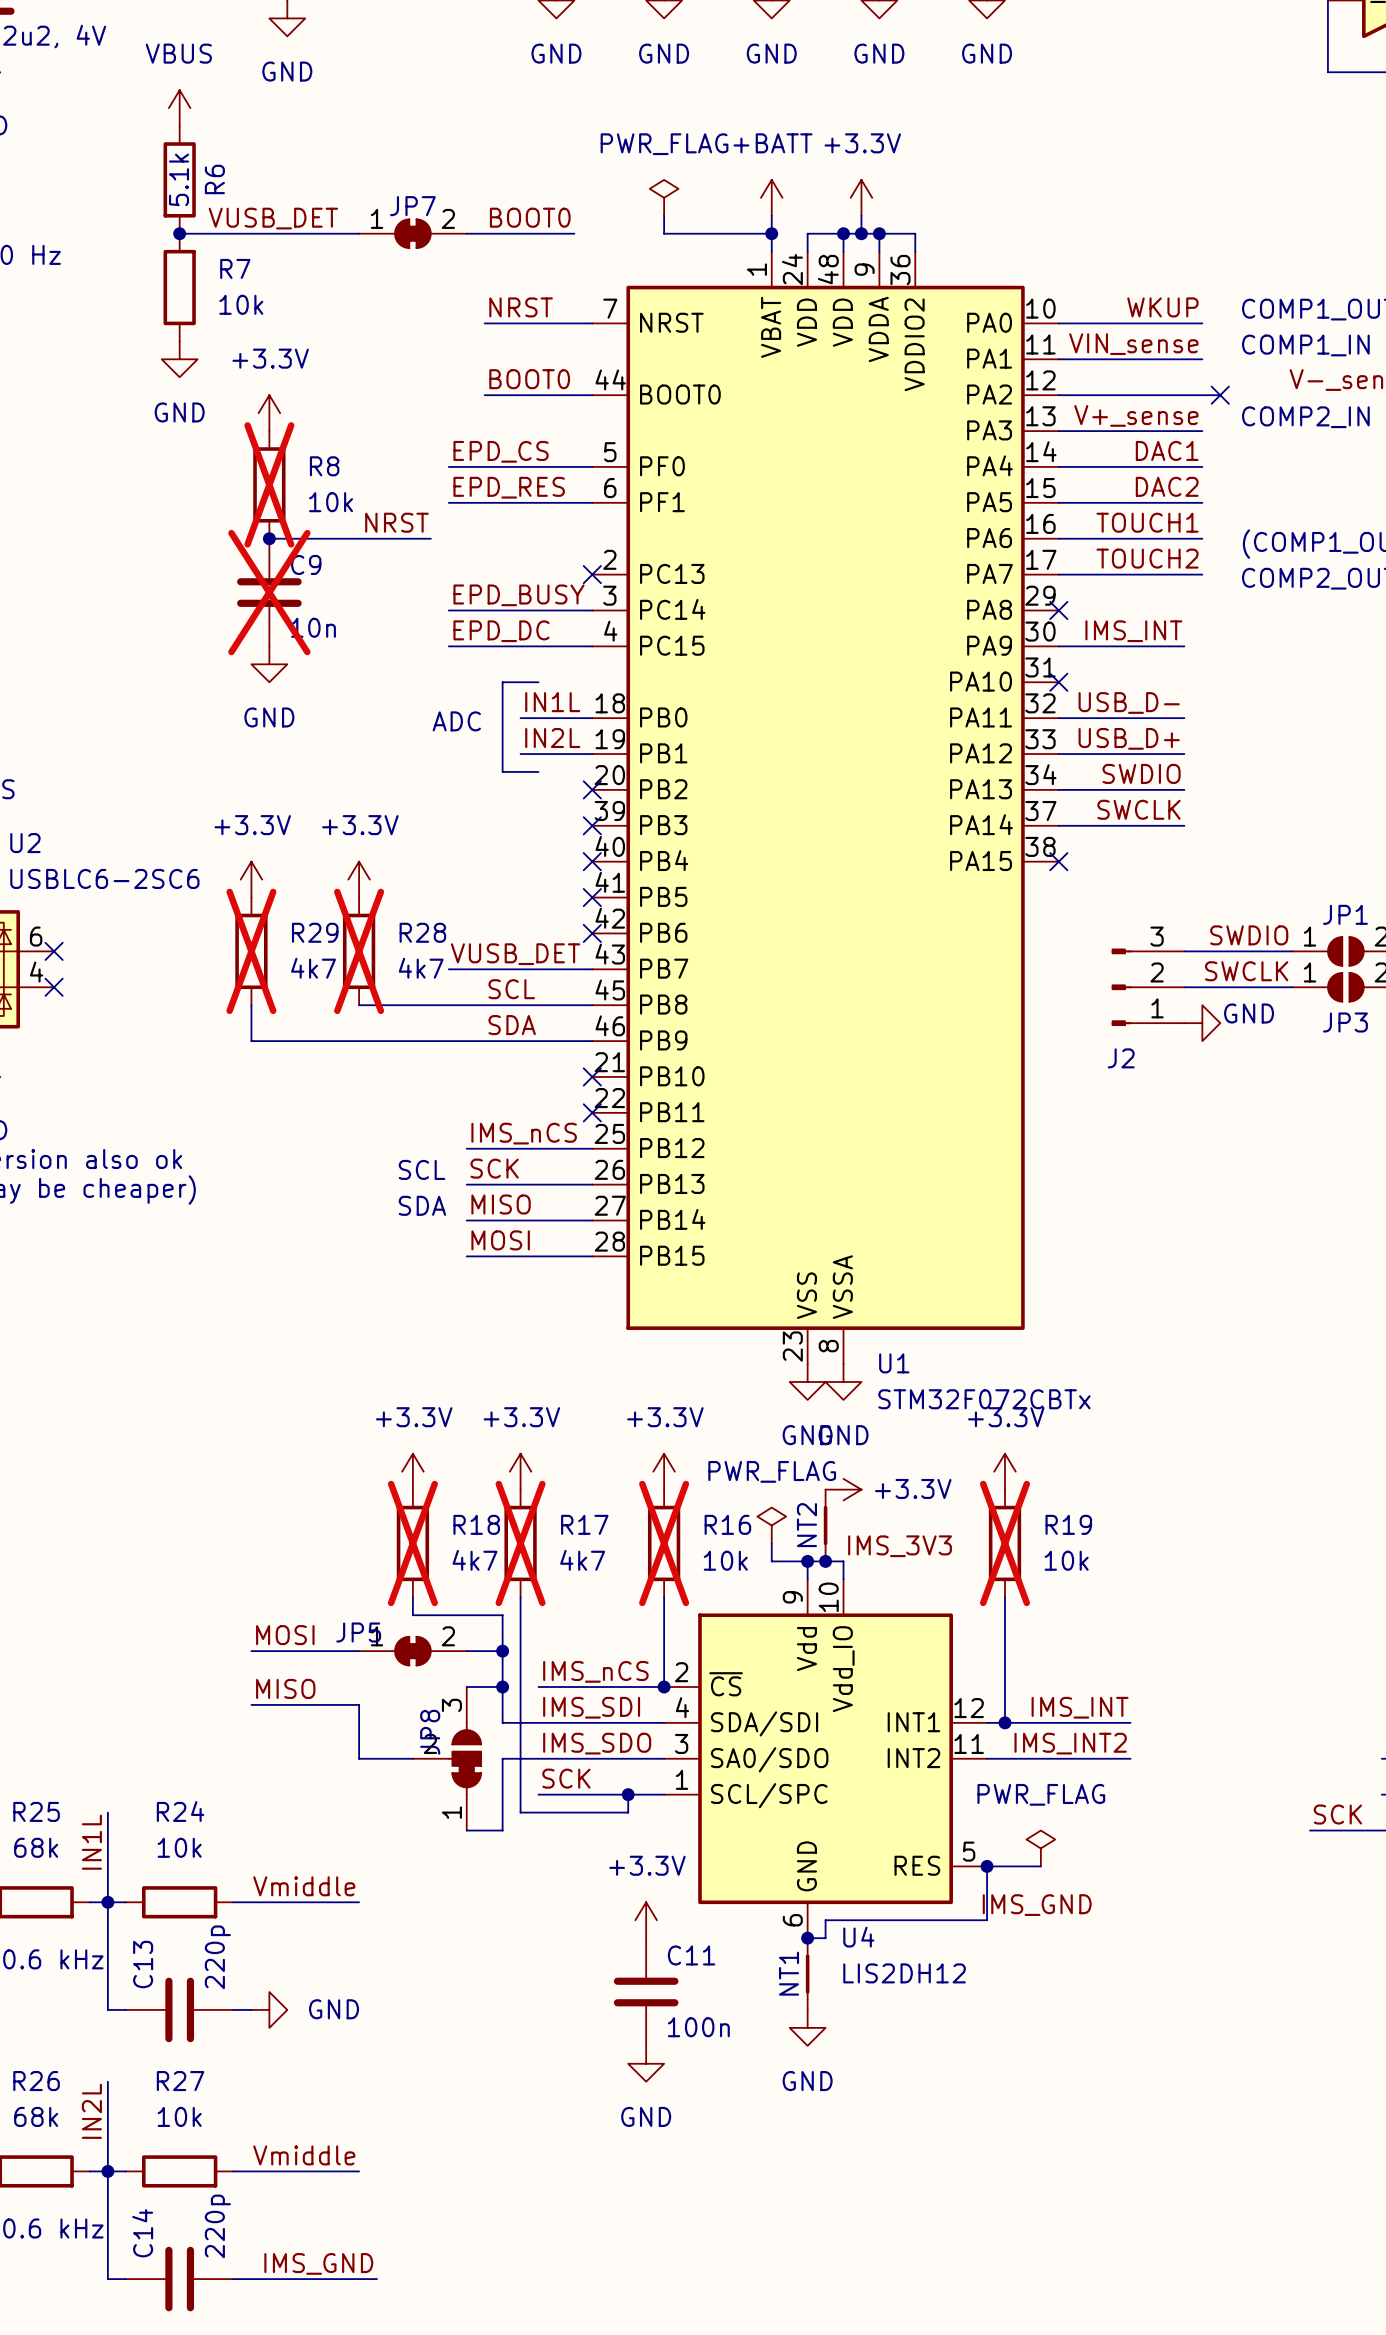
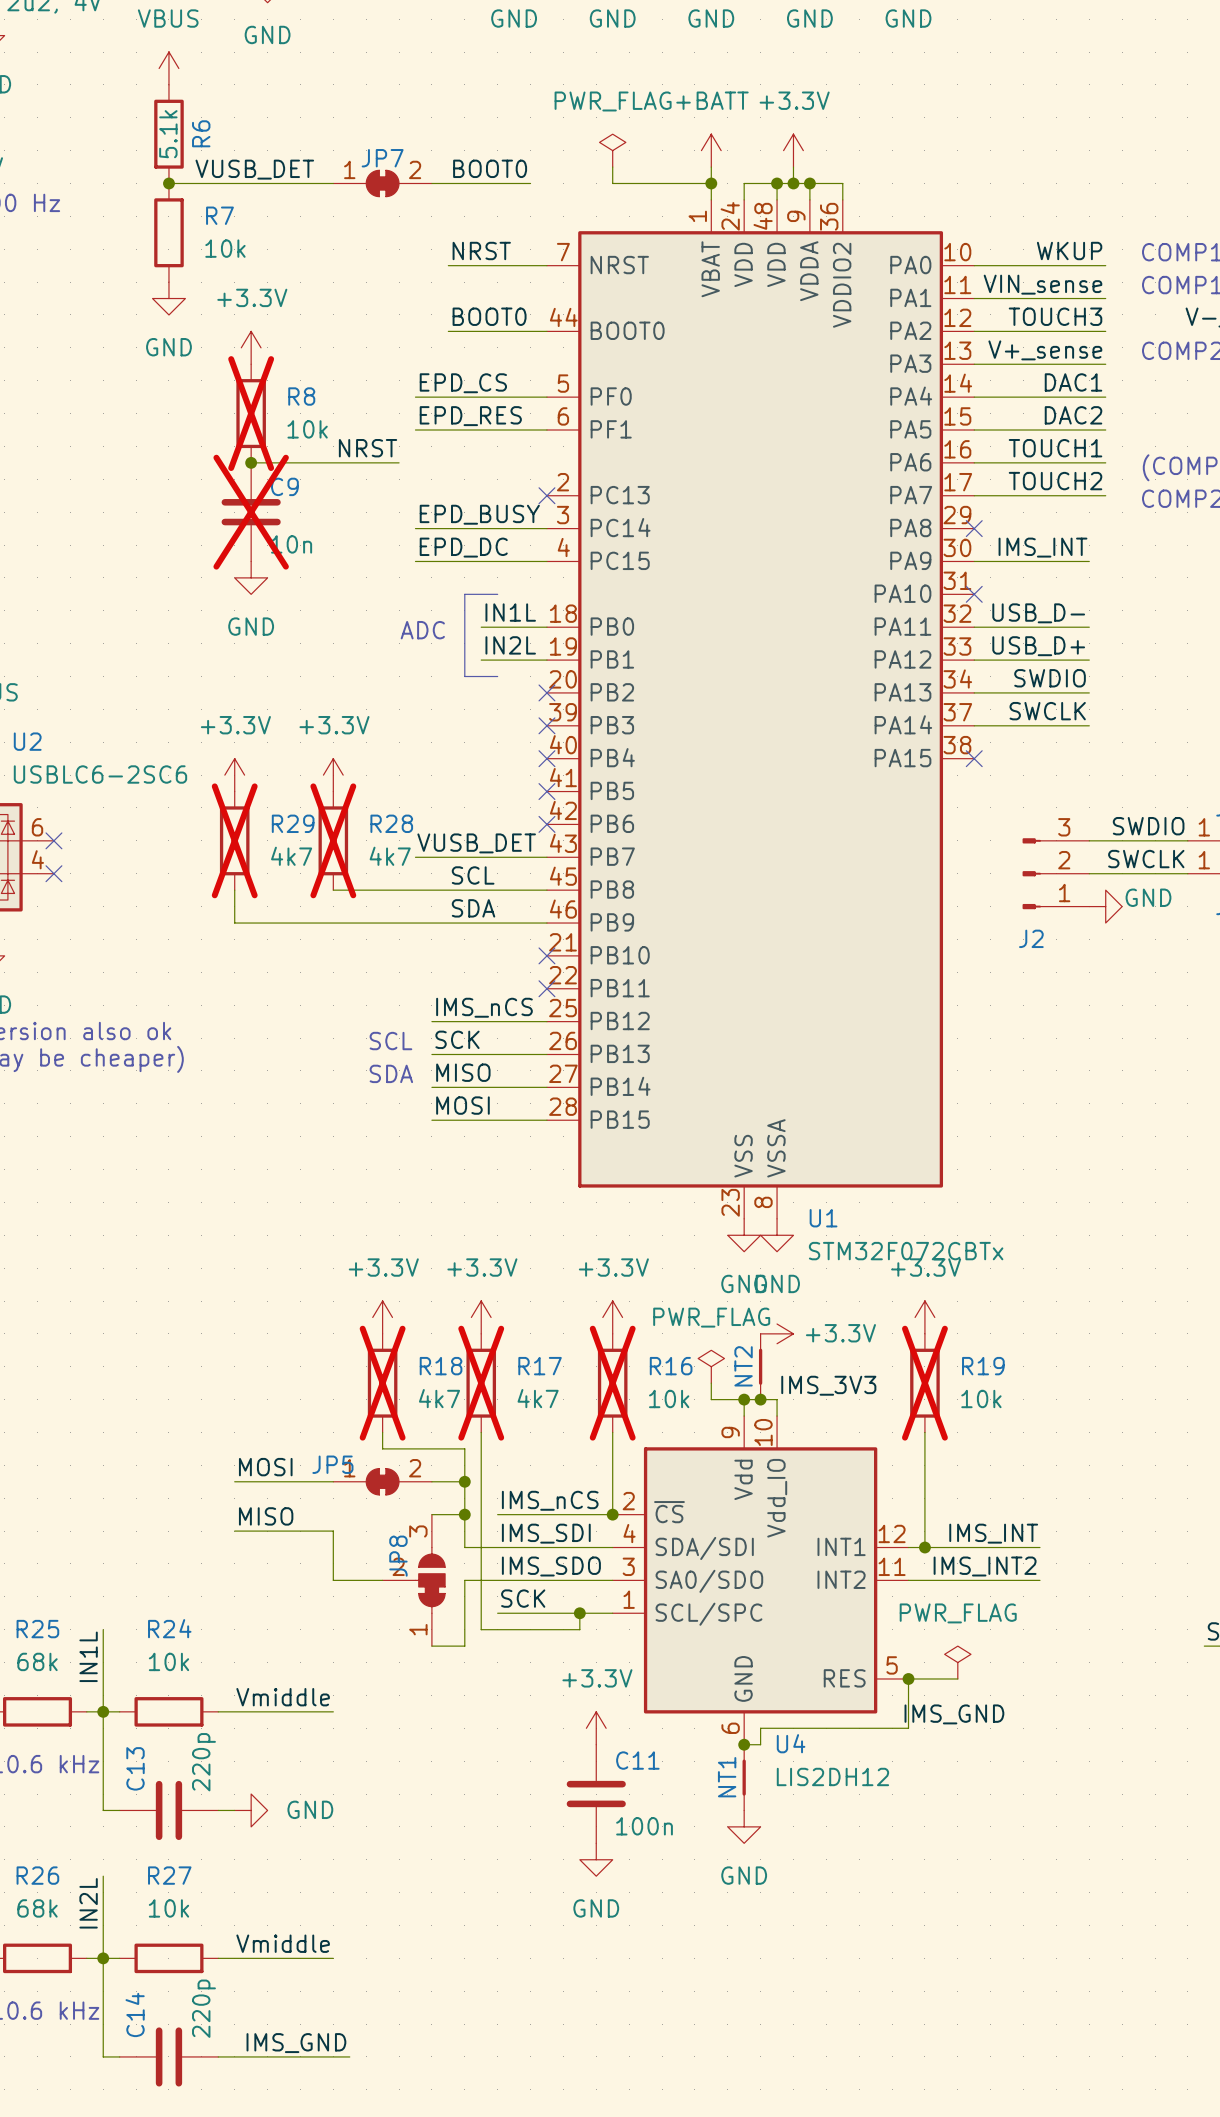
label: none -> TOUCH3 (1055, 316)
wire: (1202, 395) (1220, 395) -> none
no-connect mark: (1220, 395) -> none

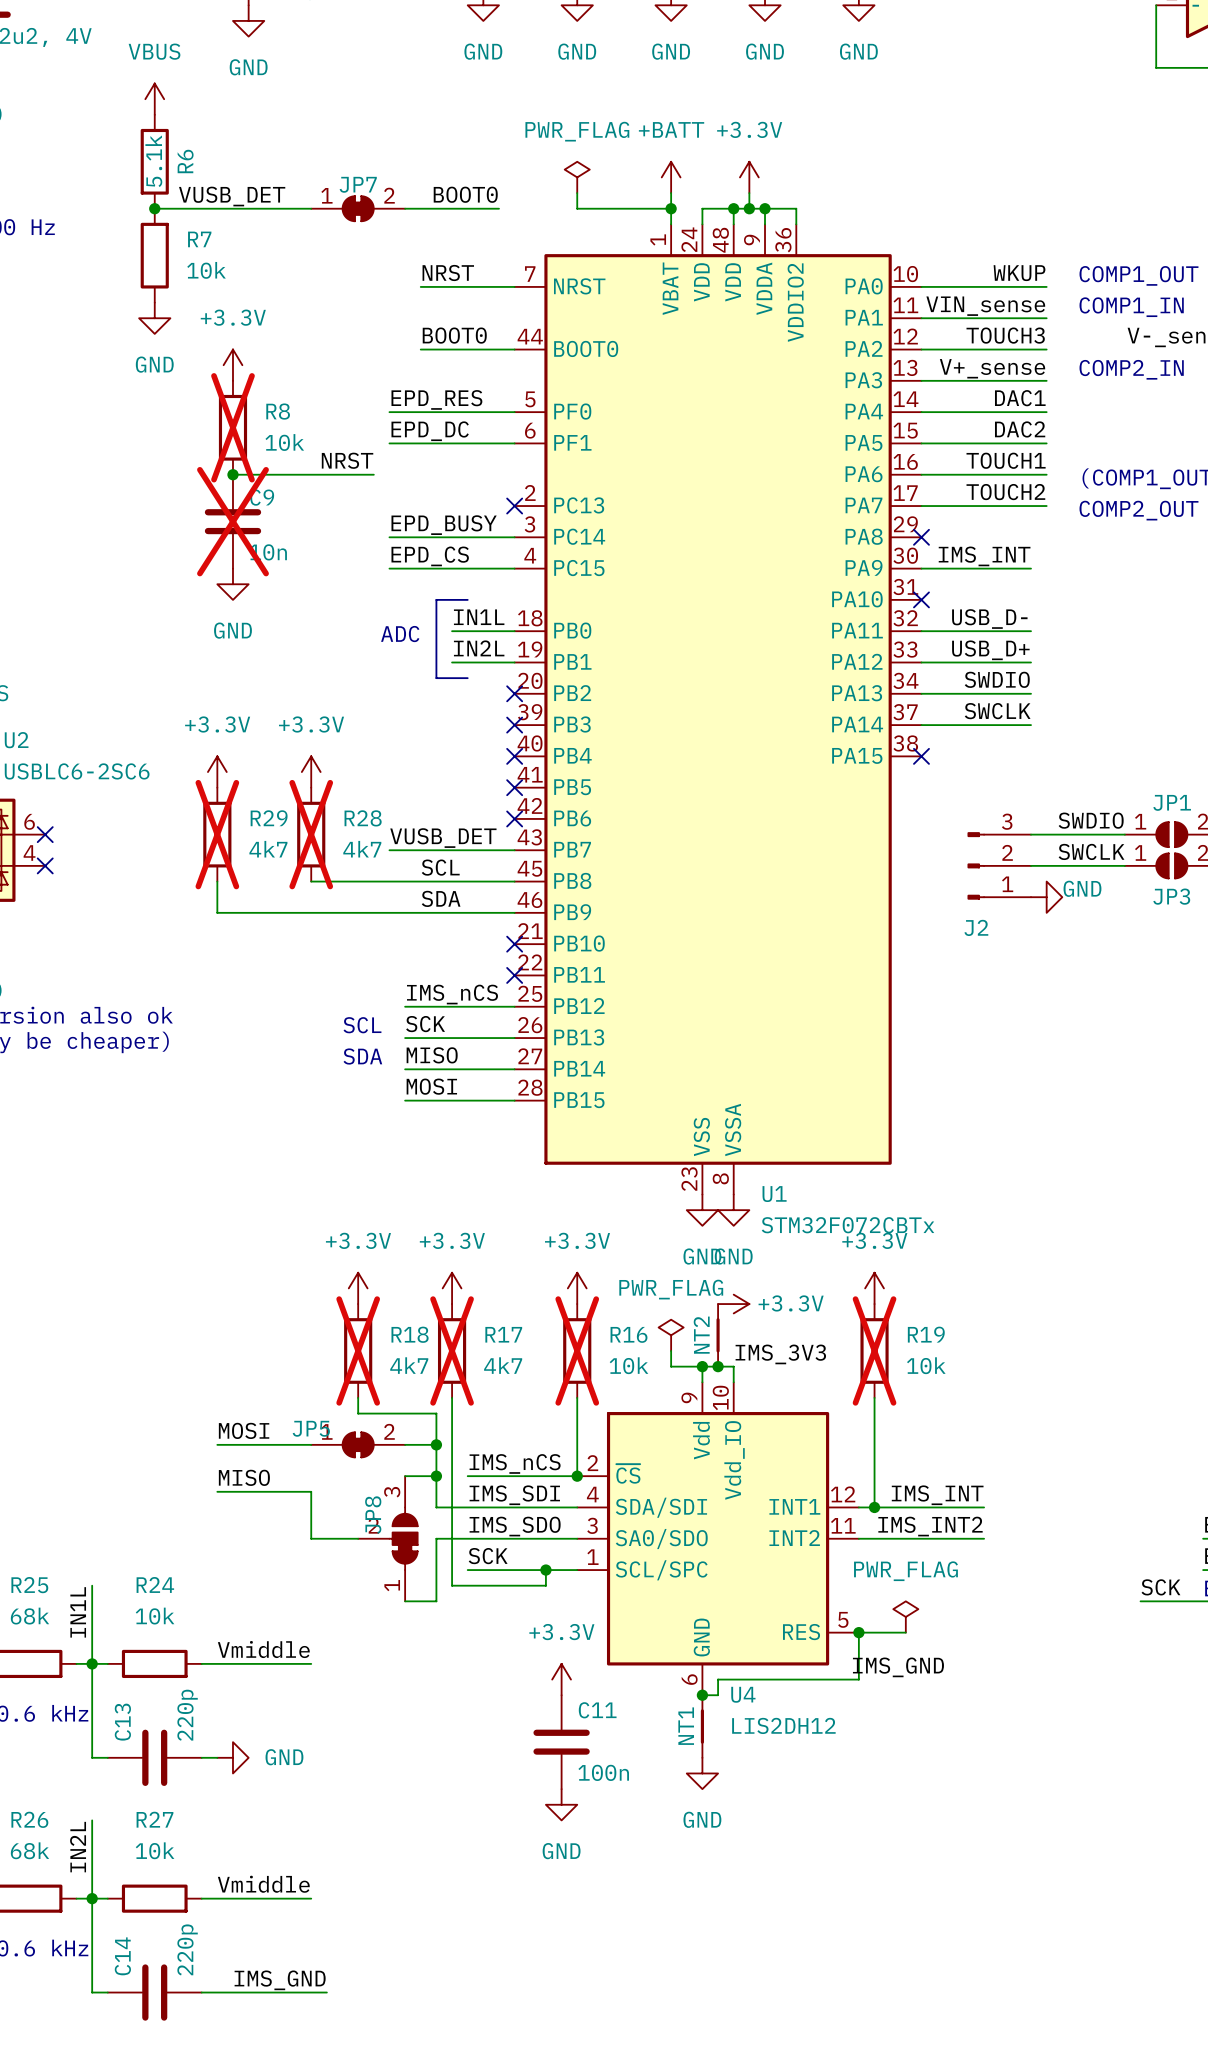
label: EPD_CS (463, 383) -> EPD_RES (436, 399)
label: EPD_RES (470, 416) -> EPD_DC (430, 431)
label: EPD_DC (463, 547) -> EPD_CS (430, 556)

